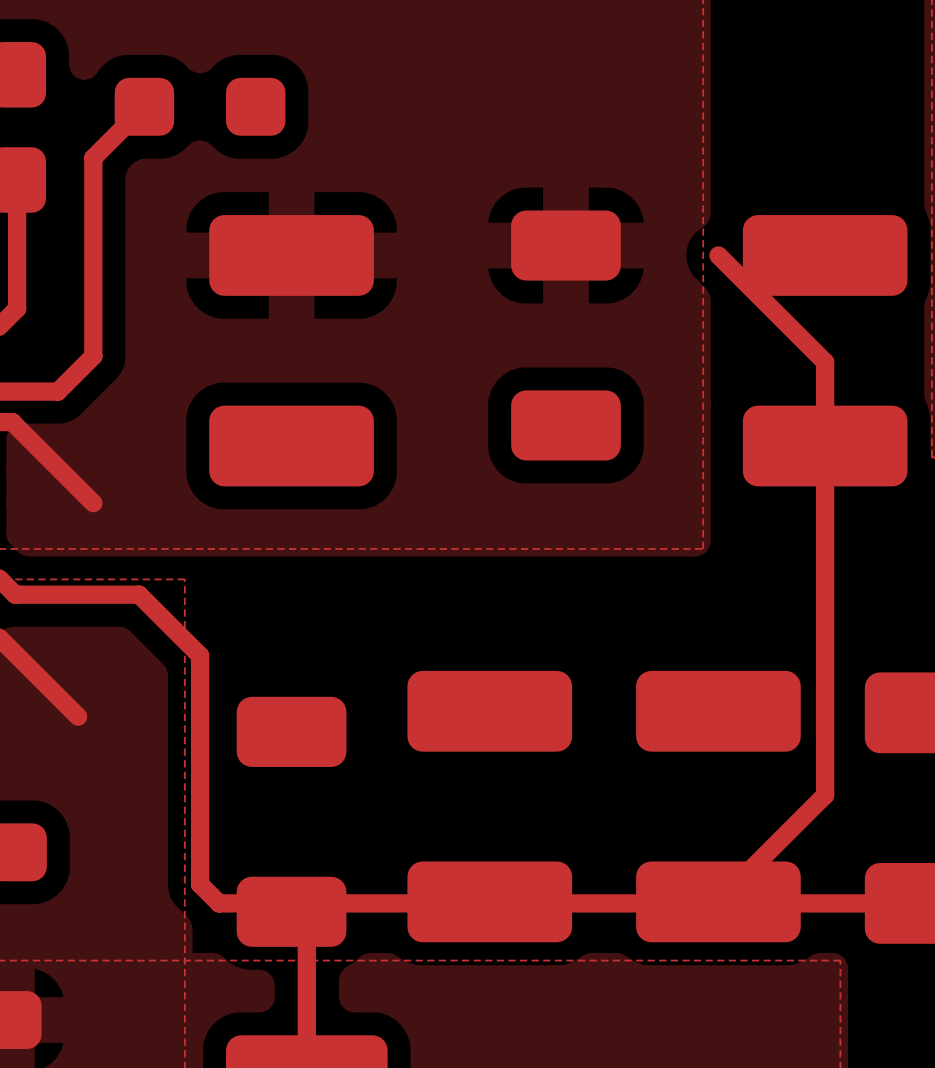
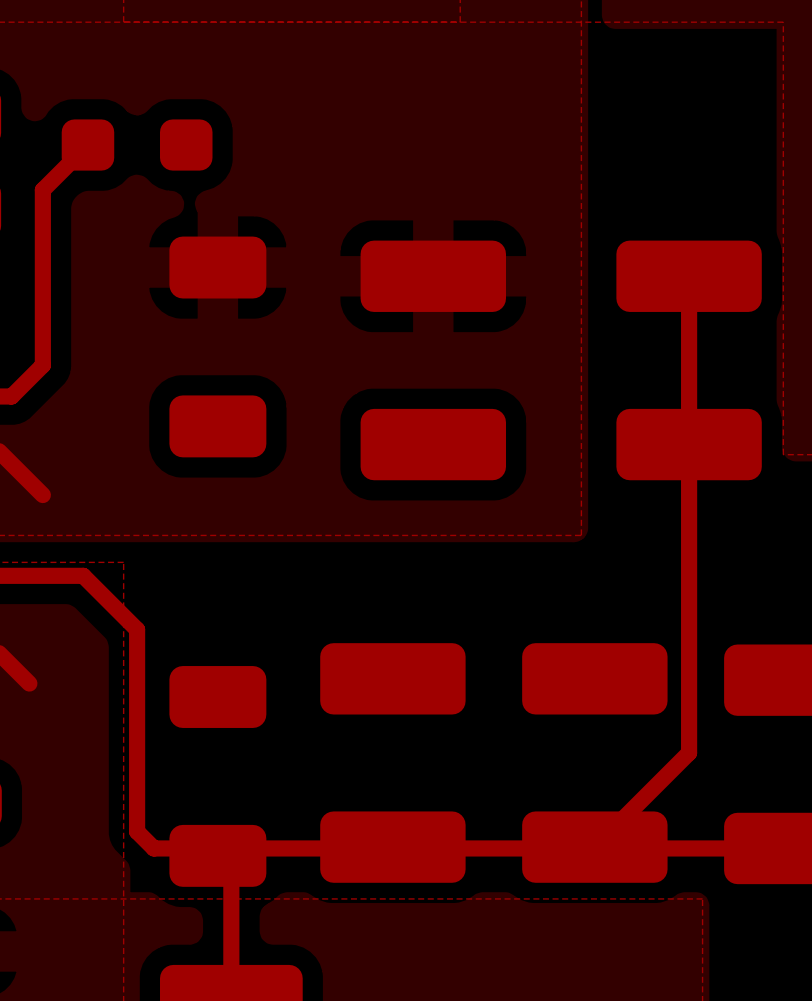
part footprint: [511, 210, 621, 461] -> [360, 240, 506, 481]
part footprint: [209, 215, 374, 487] -> [169, 236, 267, 458]
top track: (718, 255) (825, 362) -> (689, 276) (689, 370)

